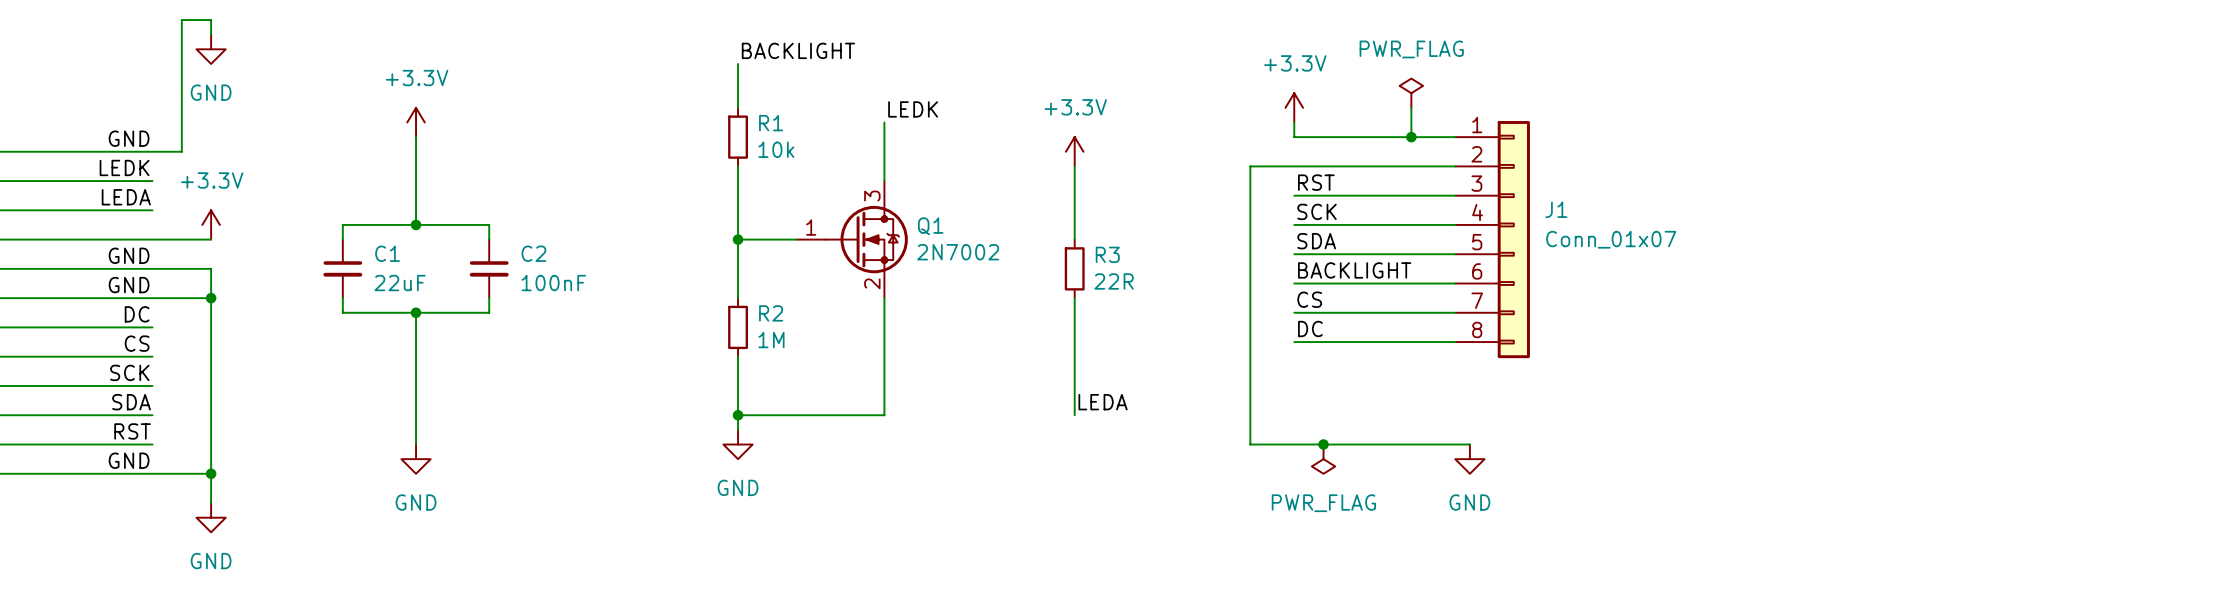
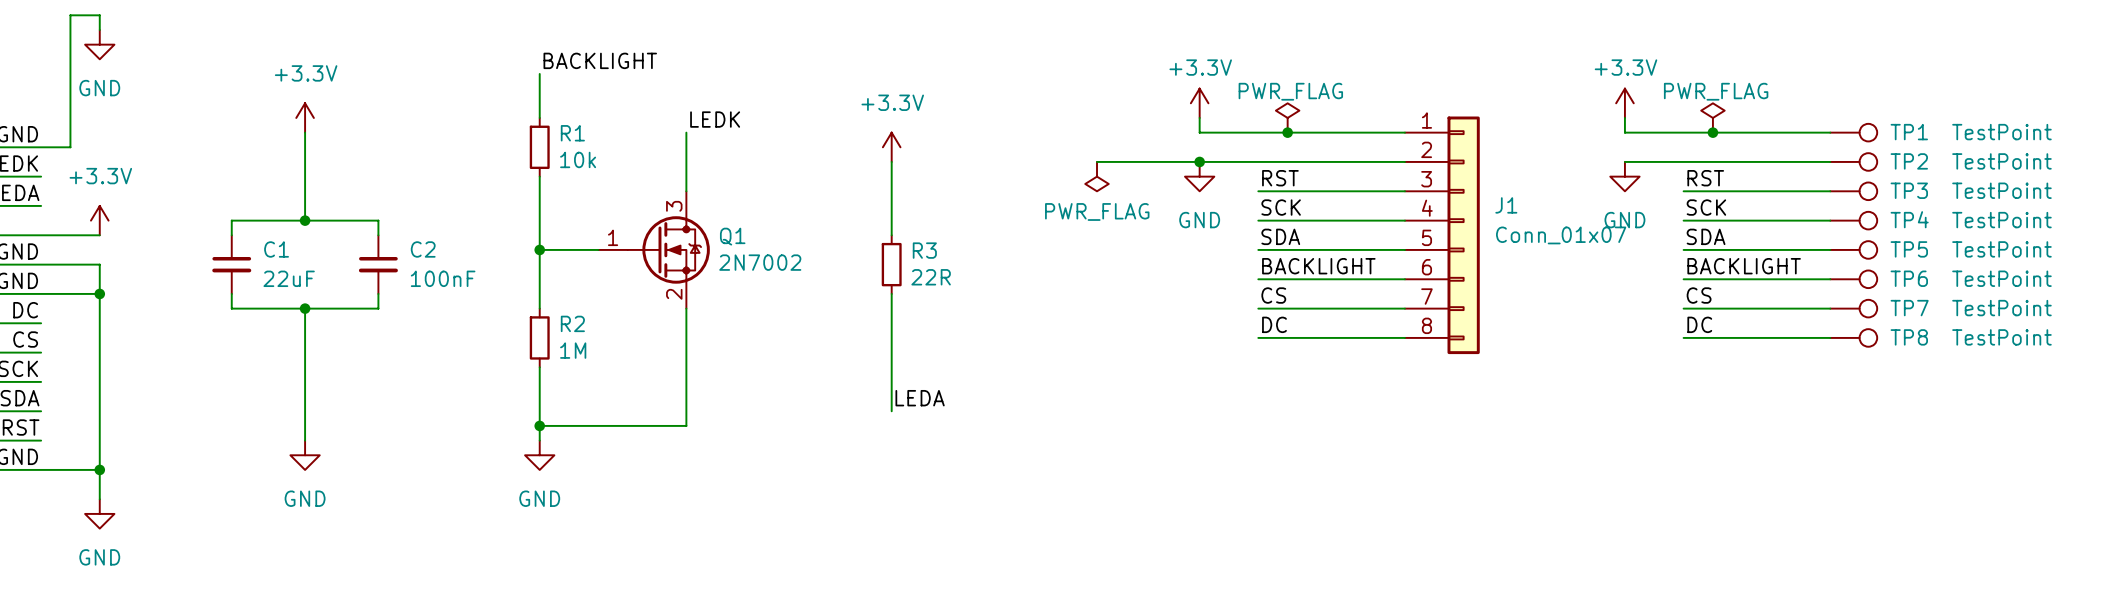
power symbol text position: PWR_FLAG (1411, 49) -> PWR_FLAG (1290, 91)
label position: BACKLIGHT (798, 50) -> BACKLIGHT (600, 60)
wire: (738, 63) (738, 107) -> (539, 73) (539, 117)
power symbol text position: +3.3V (1295, 63) -> +3.3V (1200, 67)
power symbol position: PWR_FLAG (1411, 93) -> PWR_FLAG (1287, 117)
power symbol position: +3.3V (1294, 107) -> +3.3V (1199, 103)
wire: (1411, 107) (1411, 137) -> none
power symbol: none -> +3.3V (1624, 103)
label position: LEDK (913, 109) -> LEDK (715, 119)
wire: (884, 122) (884, 181) -> (686, 132) (686, 191)
wire: (1294, 122) (1294, 137) (1308, 137) -> (1199, 117) (1199, 132)
wire: none -> (1624, 117) (1624, 132) (1830, 132)
power symbol: none -> PWR_FLAG (1712, 117)
R1 position: (738, 137) -> (539, 147)
junction position: (1411, 137) -> (1287, 132)
junction: none -> (1712, 132)
TP1: none -> TestPoint (1853, 132)
power symbol position: +3.3V (1074, 151) -> +3.3V (891, 147)
wire: (738, 166) (738, 298) -> (539, 176) (539, 308)
wire: (1074, 166) (1074, 239) -> (891, 161) (891, 235)
wire: (1250, 166) (1250, 444) (1469, 444) -> (1141, 161) (1097, 161)
junction: none -> (1199, 161)
wire: none -> (1624, 161) (1830, 161)
TP2: none -> TestPoint (1853, 161)
power symbol: none -> PWR_FLAG (1097, 176)
power symbol: none -> GND (1199, 176)
power symbol: none -> GND (1624, 176)
label position: RST (1316, 182) -> RST (1280, 178)
label: none -> RST (1705, 178)
wire: (1294, 195) (1367, 195) -> none
wire: none -> (1683, 191) (1830, 191)
TP3: none -> TestPoint (1853, 191)
label position: SCK (1317, 211) -> SCK (1281, 207)
label: none -> SCK (1706, 207)
wire: (1294, 224) (1367, 224) -> none
wire: none -> (1683, 220) (1830, 220)
TP4: none -> TestPoint (1853, 220)
wire: (738, 239) (796, 239) -> (539, 249) (598, 249)
junction: (738, 239) -> none
Q1 position: (852, 239) -> (654, 249)
J1 position: (1492, 239) -> (1442, 235)
label position: SDA (1316, 241) -> SDA (1280, 236)
label: none -> SDA (1706, 236)
junction: none -> (539, 249)
wire: (1294, 254) (1367, 254) -> none
wire: none -> (1683, 249) (1830, 249)
TP5: none -> TestPoint (1853, 249)
R3 position: (1074, 268) -> (891, 264)
label position: BACKLIGHT (1354, 270) -> BACKLIGHT (1318, 266)
label: none -> BACKLIGHT (1744, 266)
wire: (1294, 283) (1367, 283) -> none
wire: none -> (1683, 279) (1830, 279)
TP6: none -> TestPoint (1853, 279)
wire: (884, 298) (884, 415) (738, 415) -> (686, 308) (686, 425) (539, 425)
wire: (1074, 298) (1074, 415) -> (891, 293) (891, 411)
label position: CS (1309, 299) -> CS (1273, 295)
label: none -> CS (1699, 295)
wire: (1294, 312) (1367, 312) -> none
wire: none -> (1683, 308) (1830, 308)
TP7: none -> TestPoint (1853, 308)
R2 position: (738, 327) -> (539, 337)
label position: DC (1310, 328) -> DC (1274, 324)
label: none -> DC (1699, 324)
wire: (1294, 342) (1367, 342) -> none
wire: none -> (1683, 337) (1830, 337)
TP8: none -> TestPoint (1853, 337)
wire: (738, 356) (738, 429) -> (539, 367) (539, 440)
label position: LEDA (1103, 402) -> LEDA (920, 398)
junction: (738, 415) -> none
junction: none -> (539, 425)
power symbol position: GND (738, 444) -> GND (539, 455)
junction: (1323, 444) -> none
power symbol: PWR_FLAG (1323, 459) -> none
power symbol: GND (1469, 459) -> none

